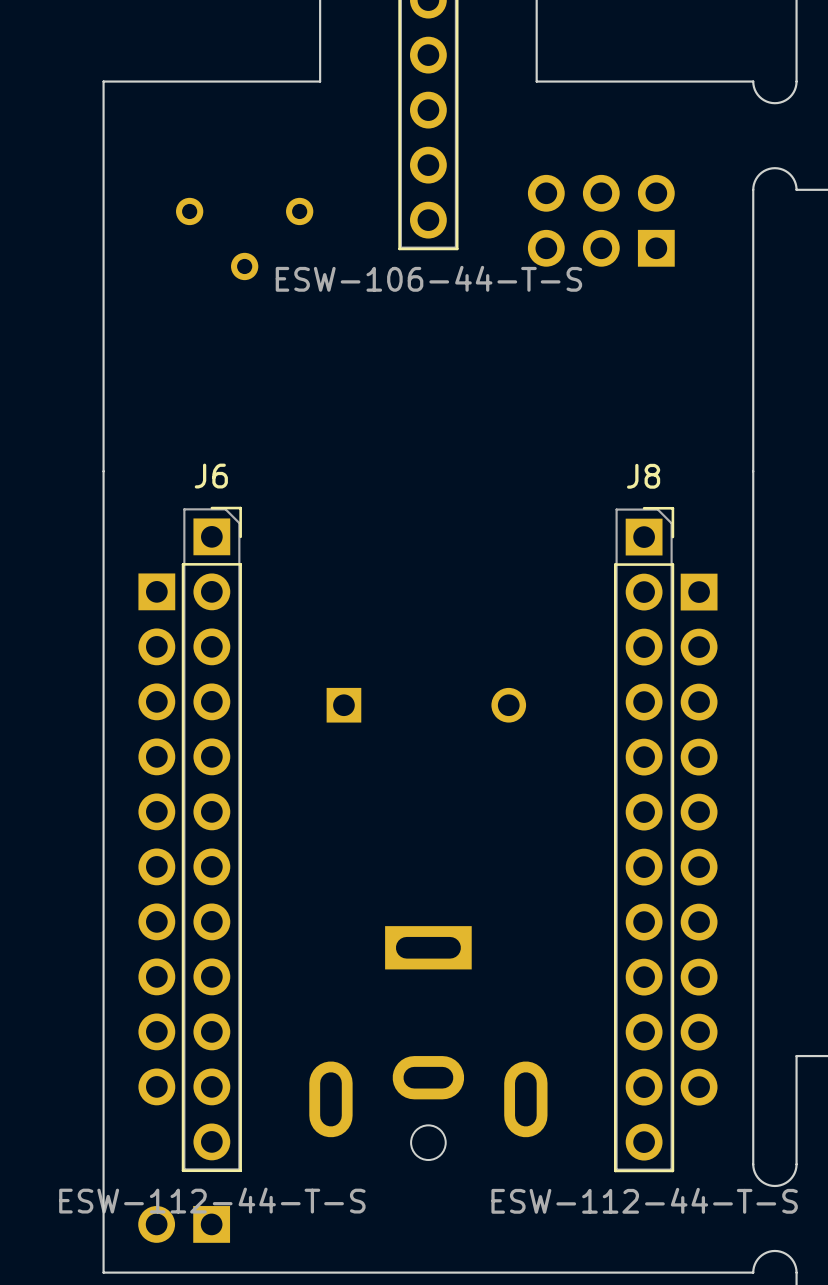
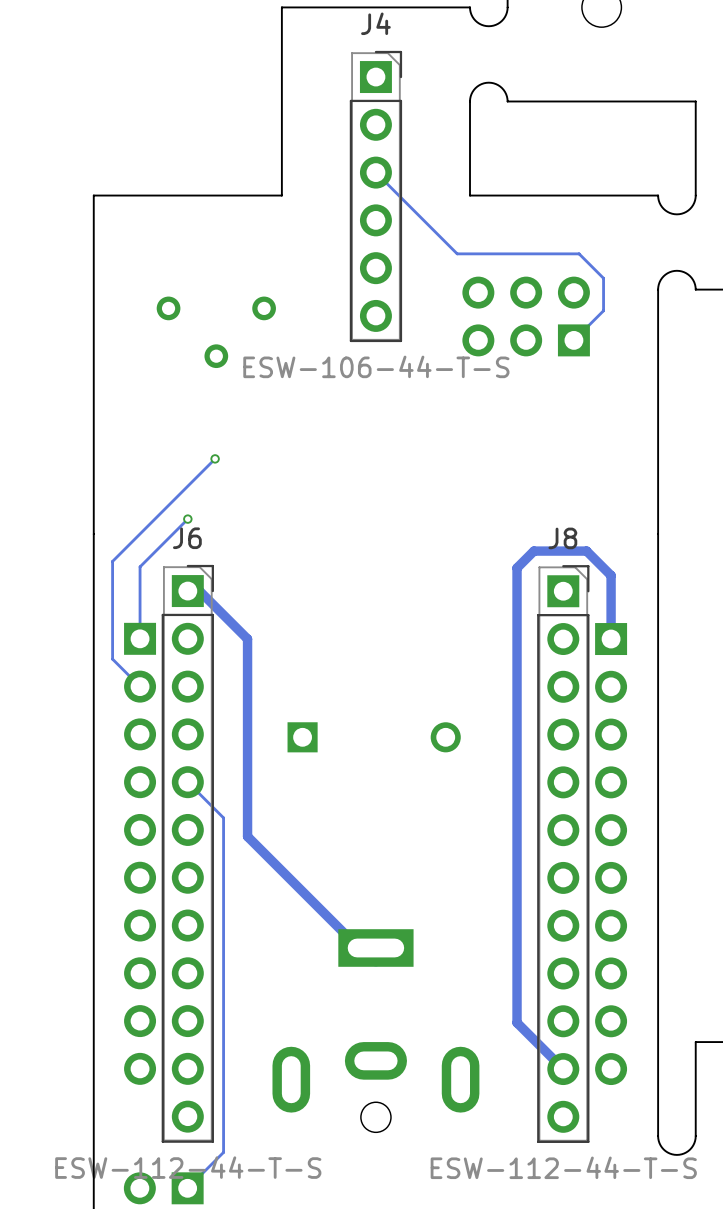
track: none -> (375, 172) (457, 253) (579, 253) (603, 278) (603, 310) (573, 340)
track: none -> (215, 458) (112, 561) (112, 659) (140, 686)
via: none -> (215, 458)
track: none -> (187, 519) (140, 566) (140, 638)
via: none -> (187, 519)
track: none -> (187, 591) (199, 591) (247, 639) (247, 836) (359, 948) (375, 948) (375, 961)
track: none -> (611, 639) (611, 575) (586, 551) (533, 551) (517, 568) (517, 1022) (563, 1069)
track: none -> (187, 782) (223, 817) (223, 1152) (187, 1188)

